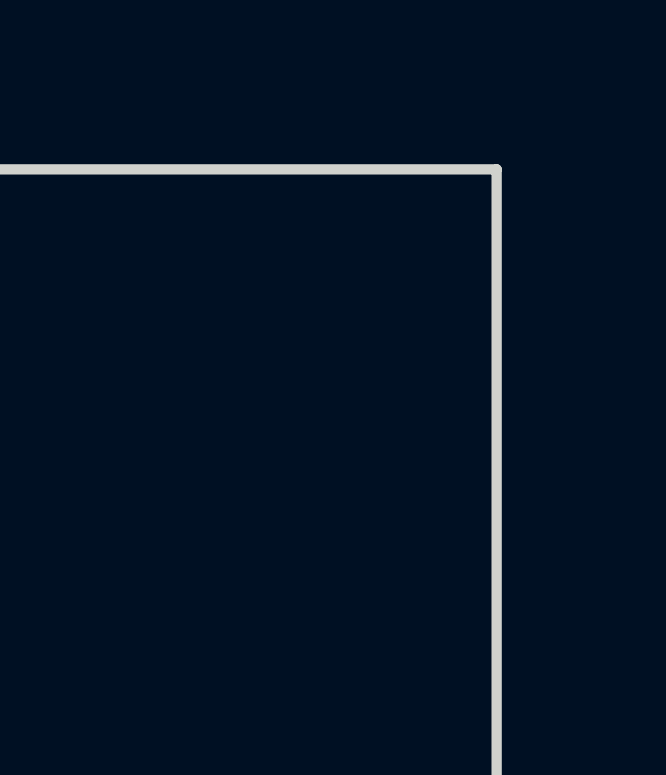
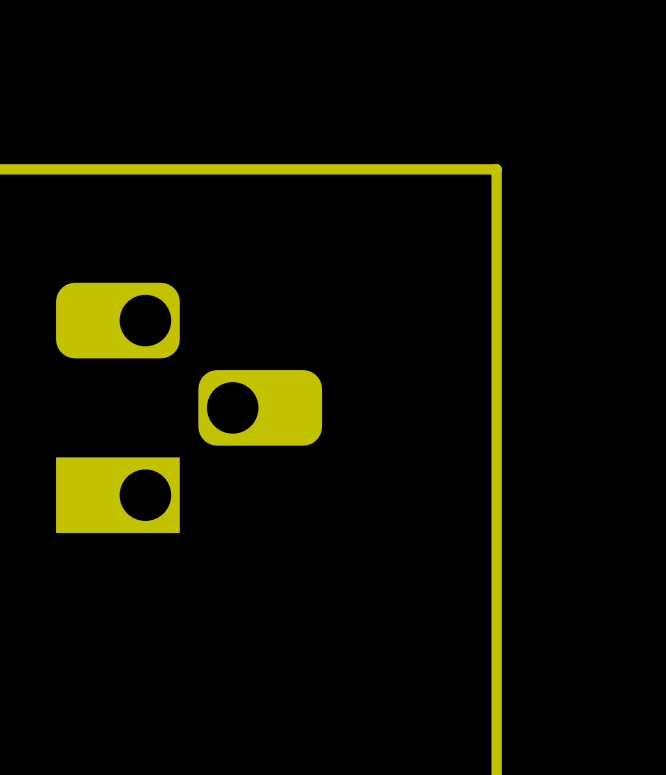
part: none -> (189, 407)

